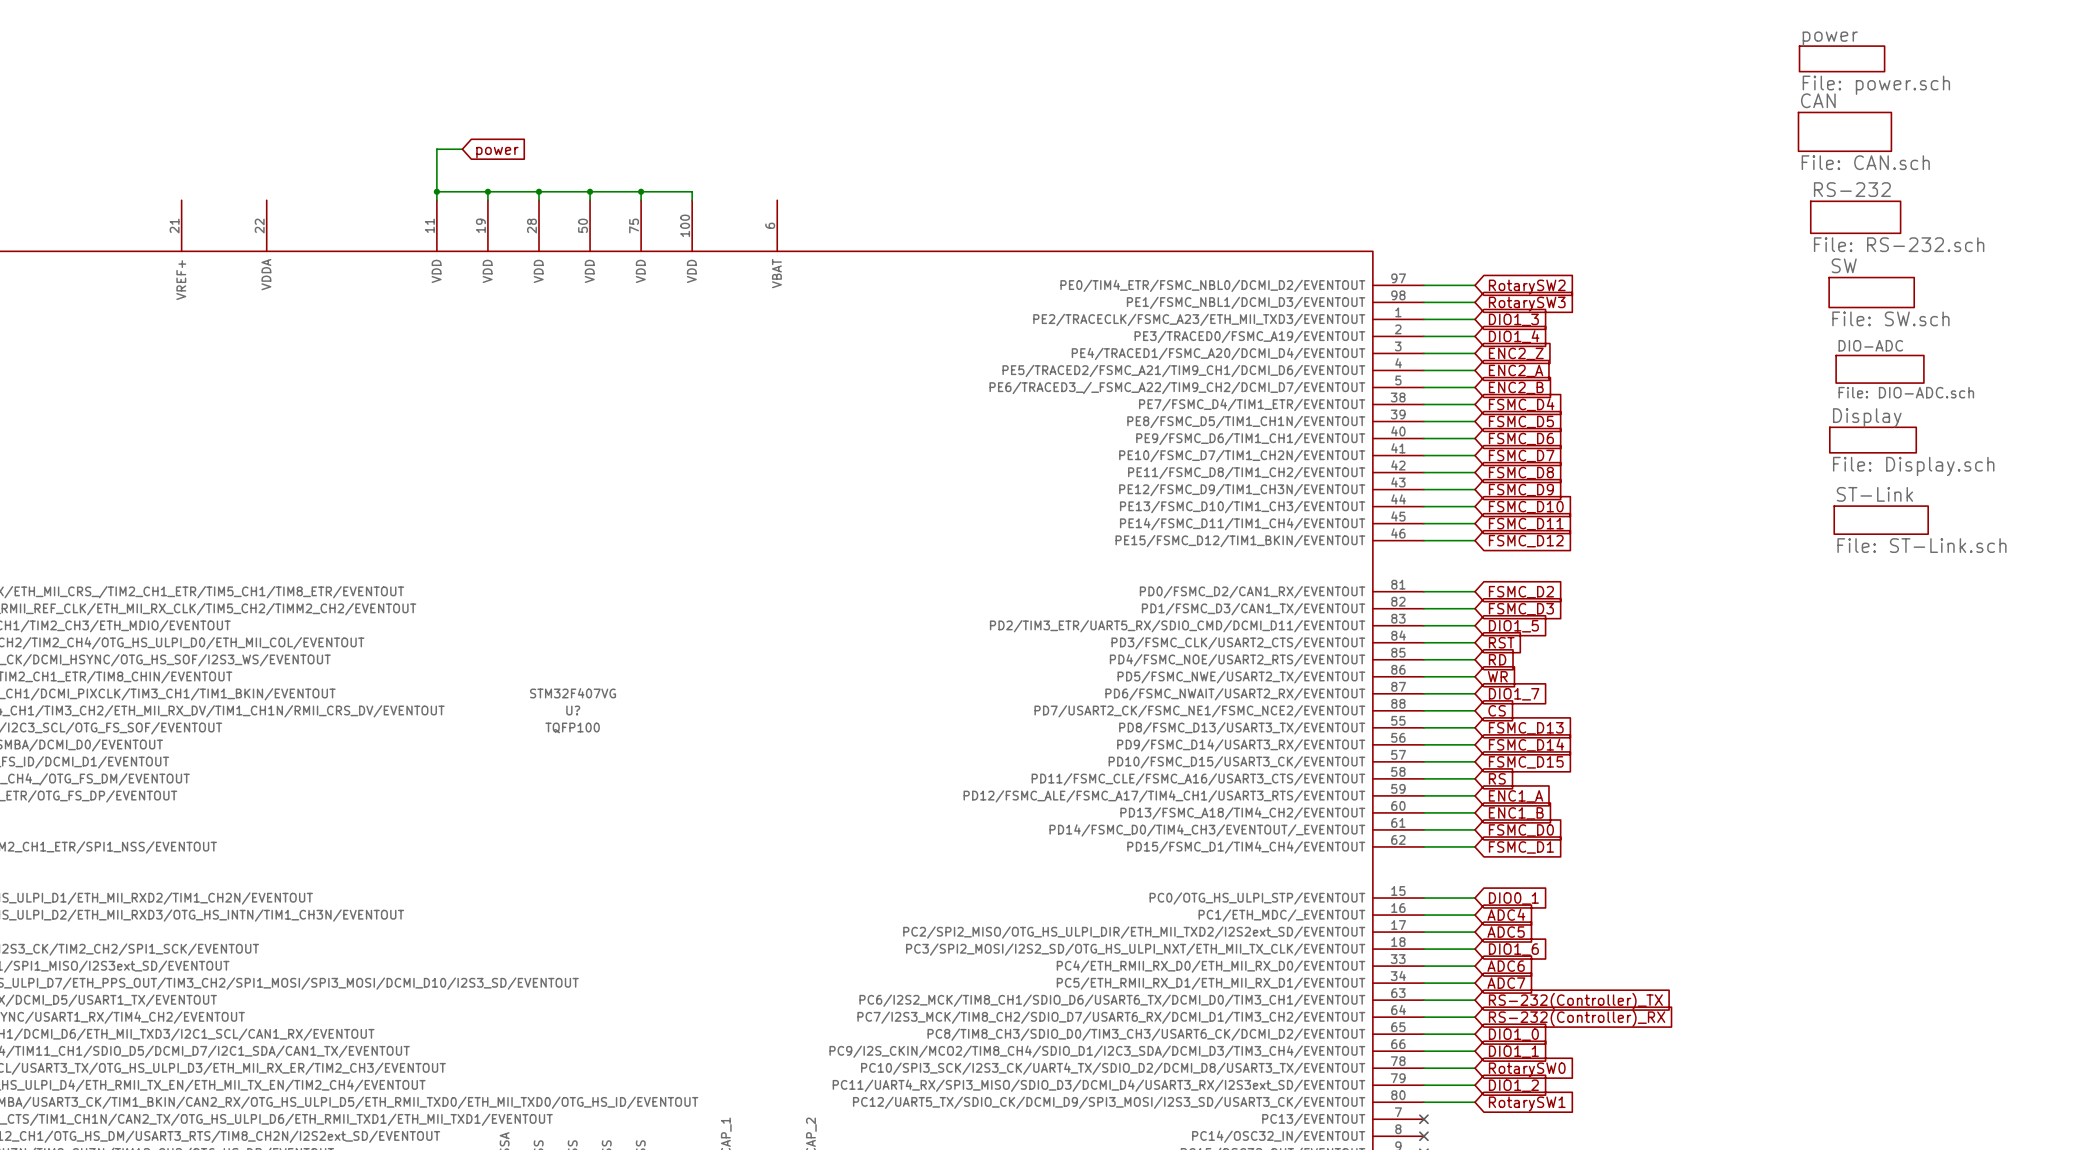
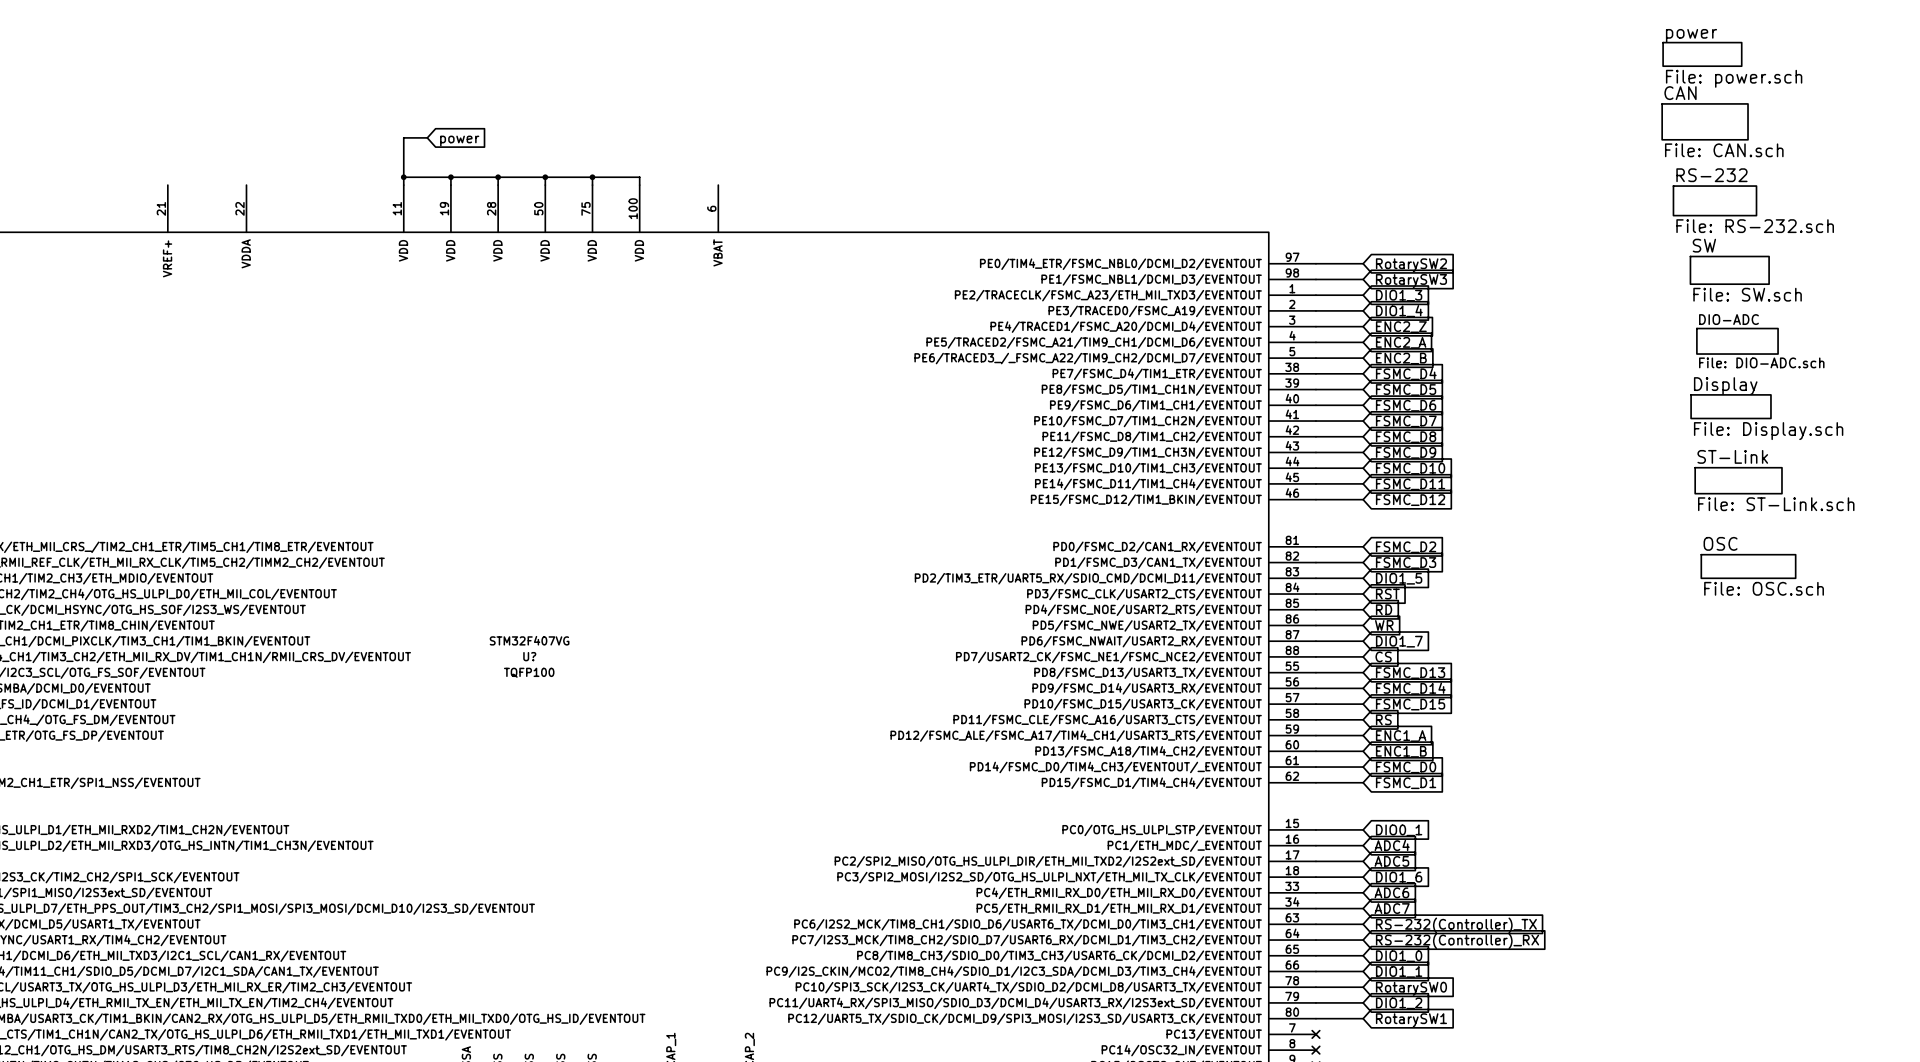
sheet OSC: none -> File: OSC.sch (1748, 566)

